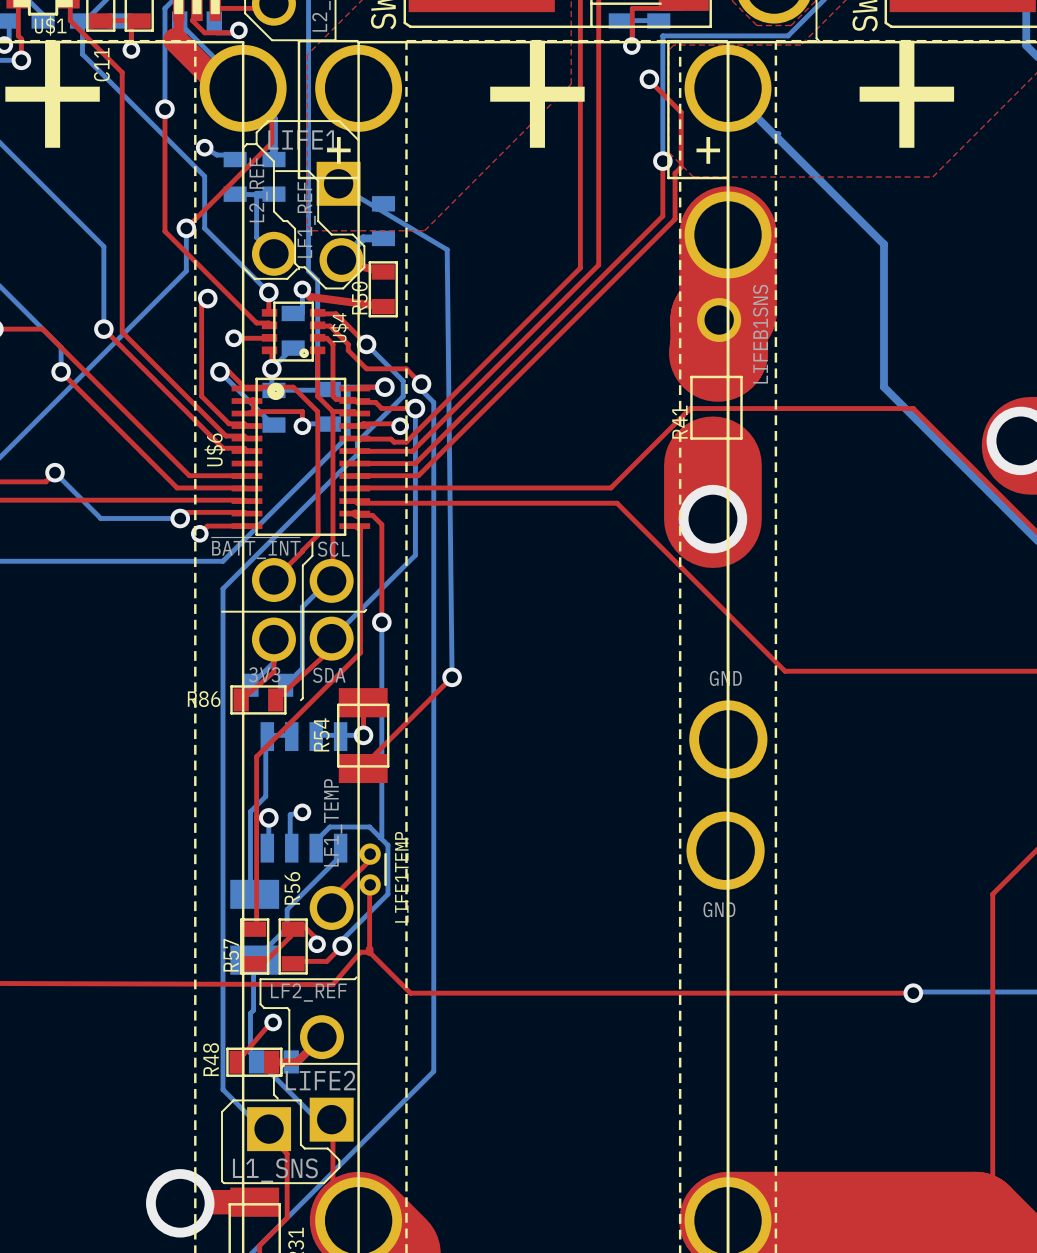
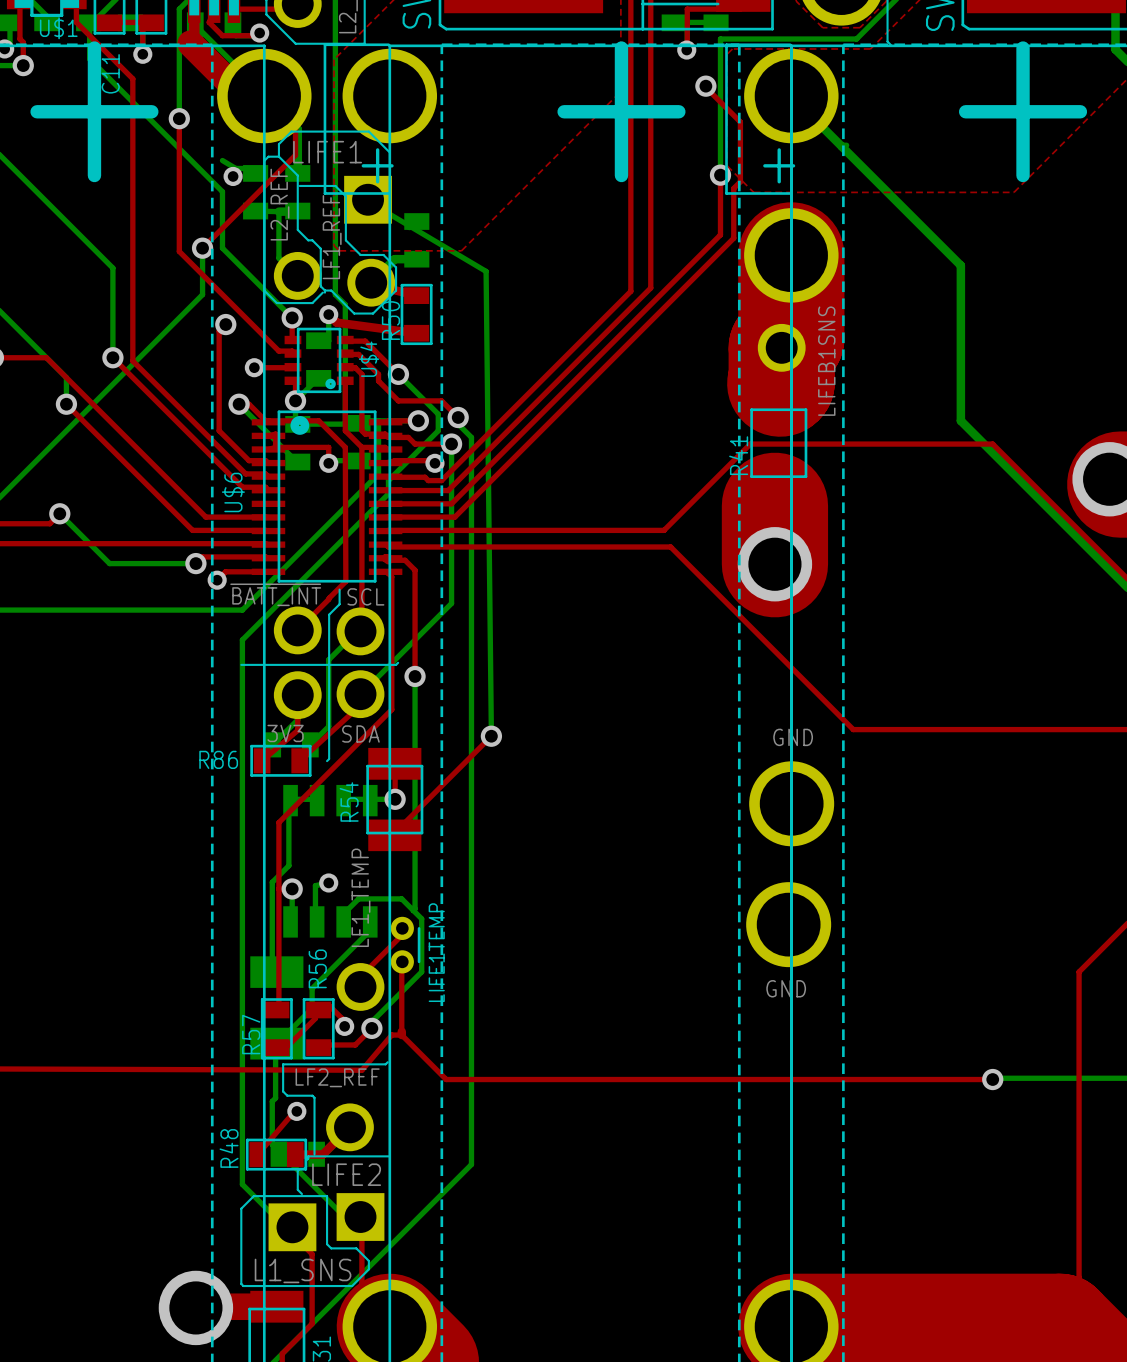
via position: (204, 147) -> (233, 176)

